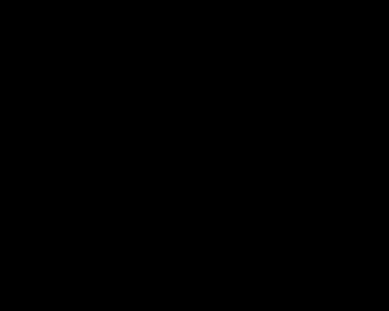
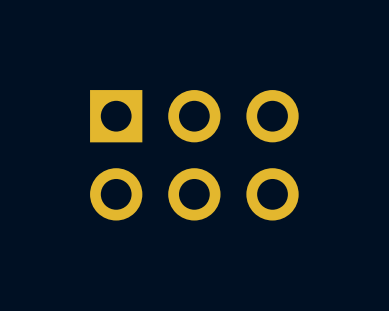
part: none -> (194, 155)

